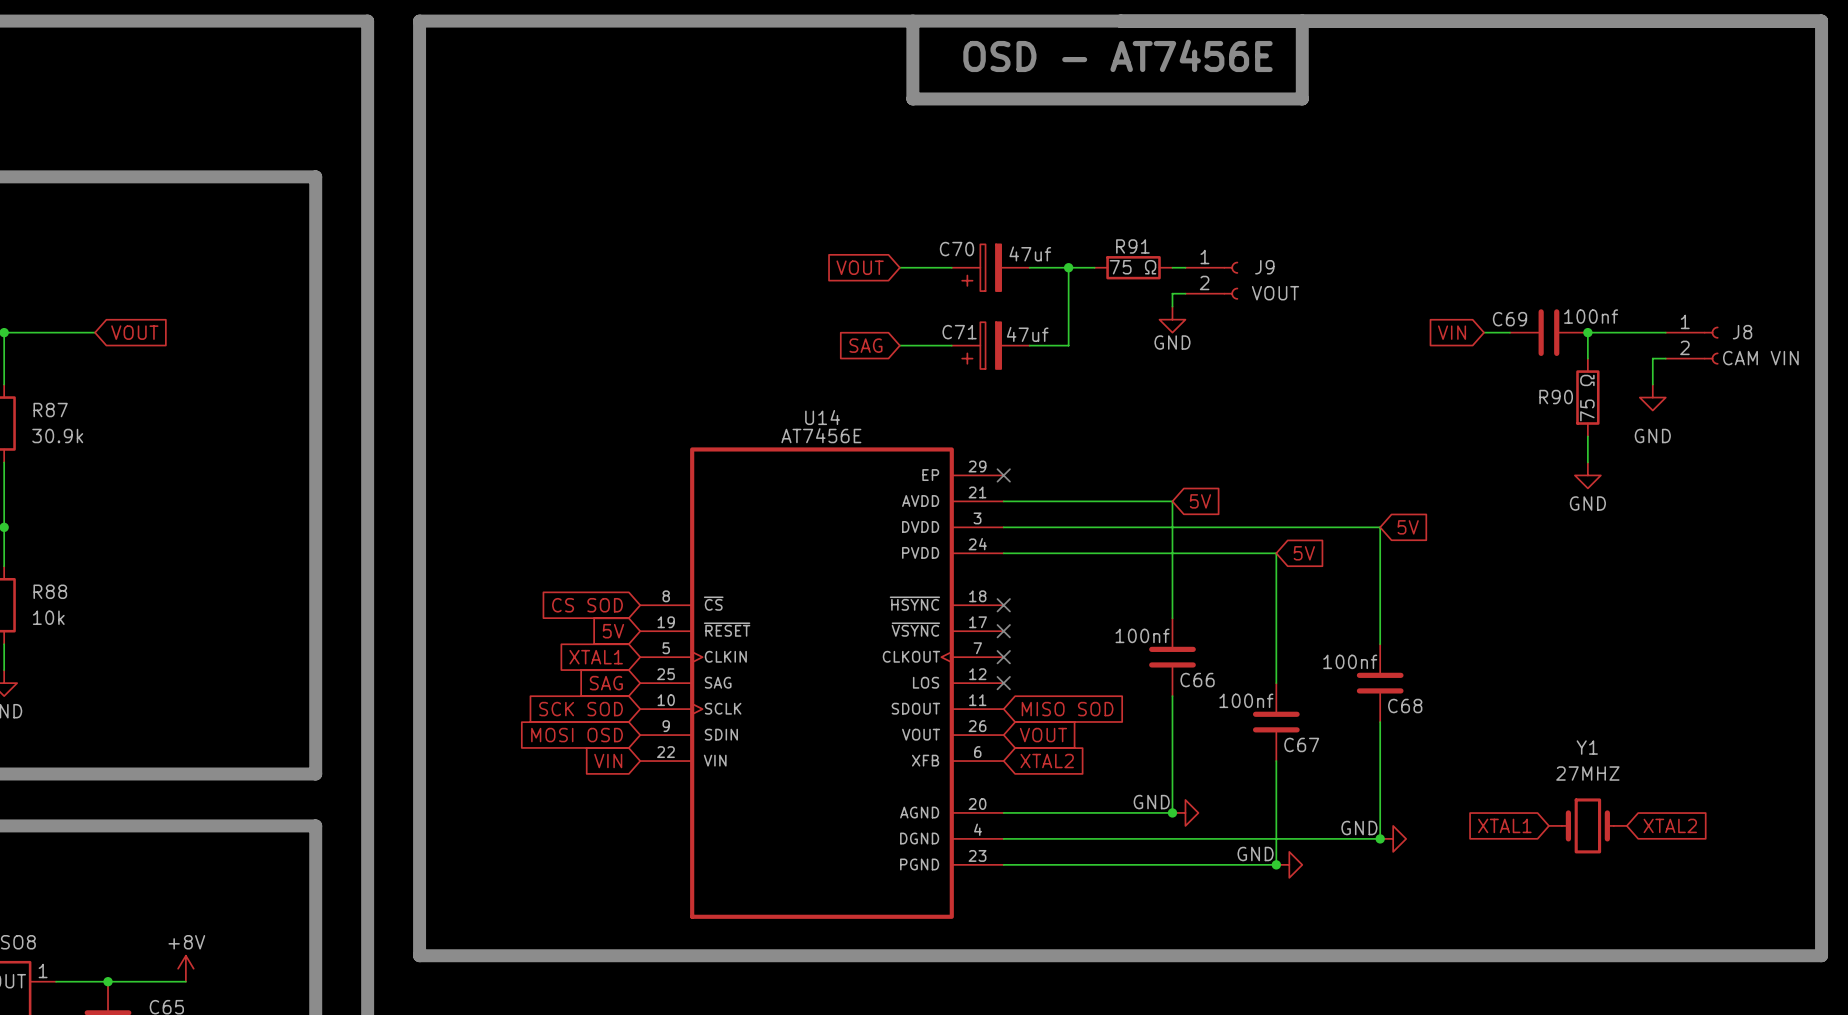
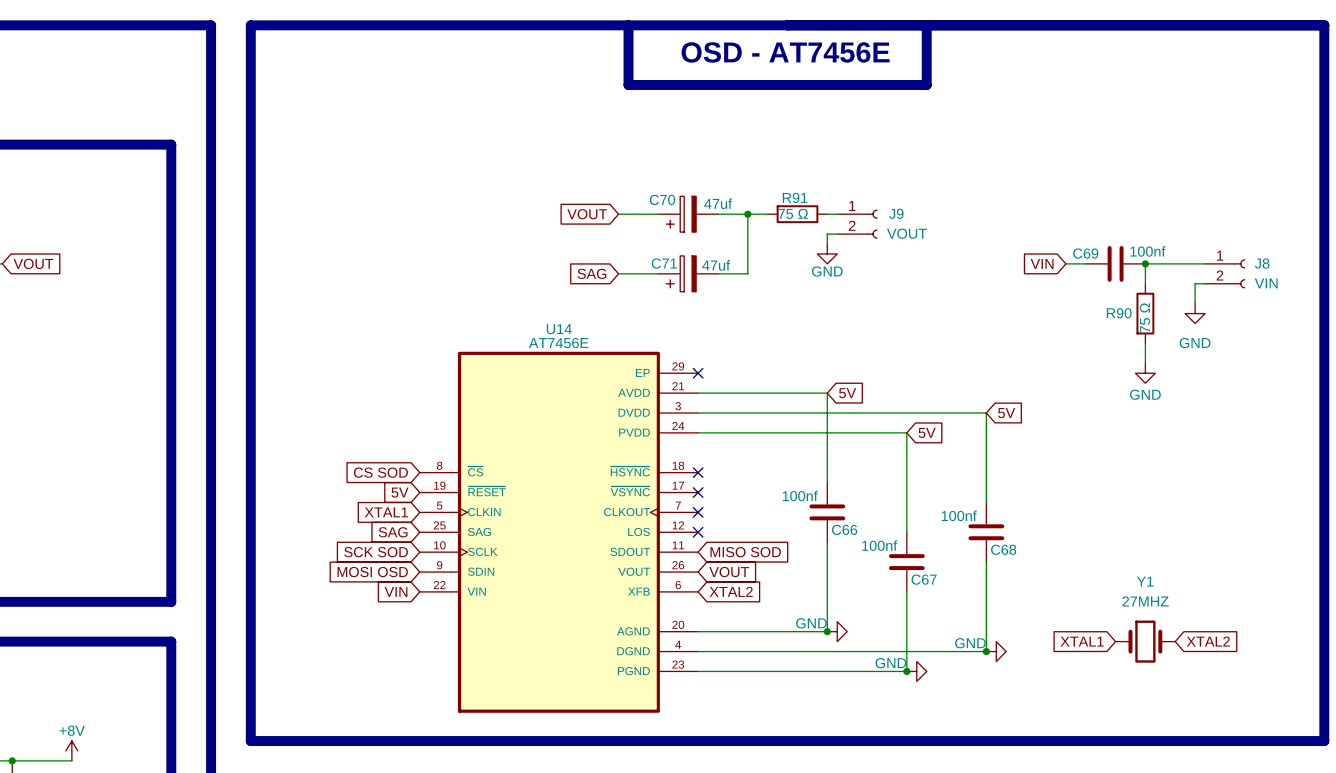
J8 value: CAM VIN (1760, 358) -> VIN (1266, 283)

